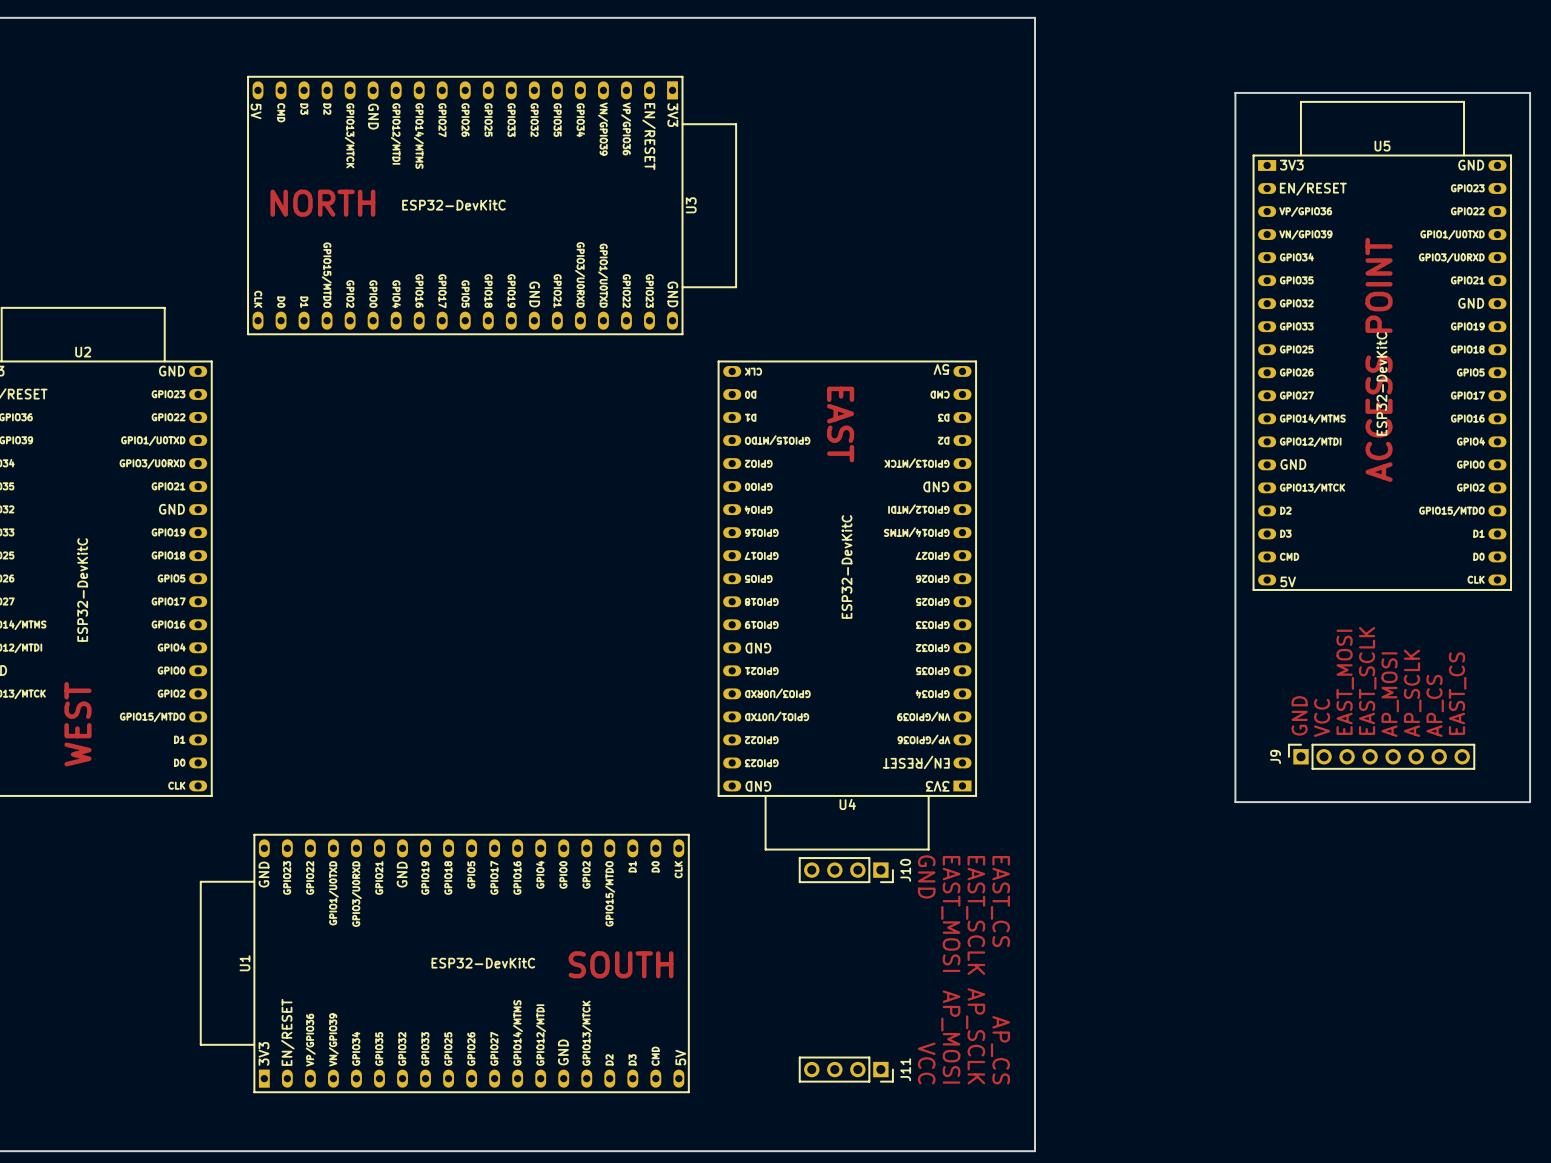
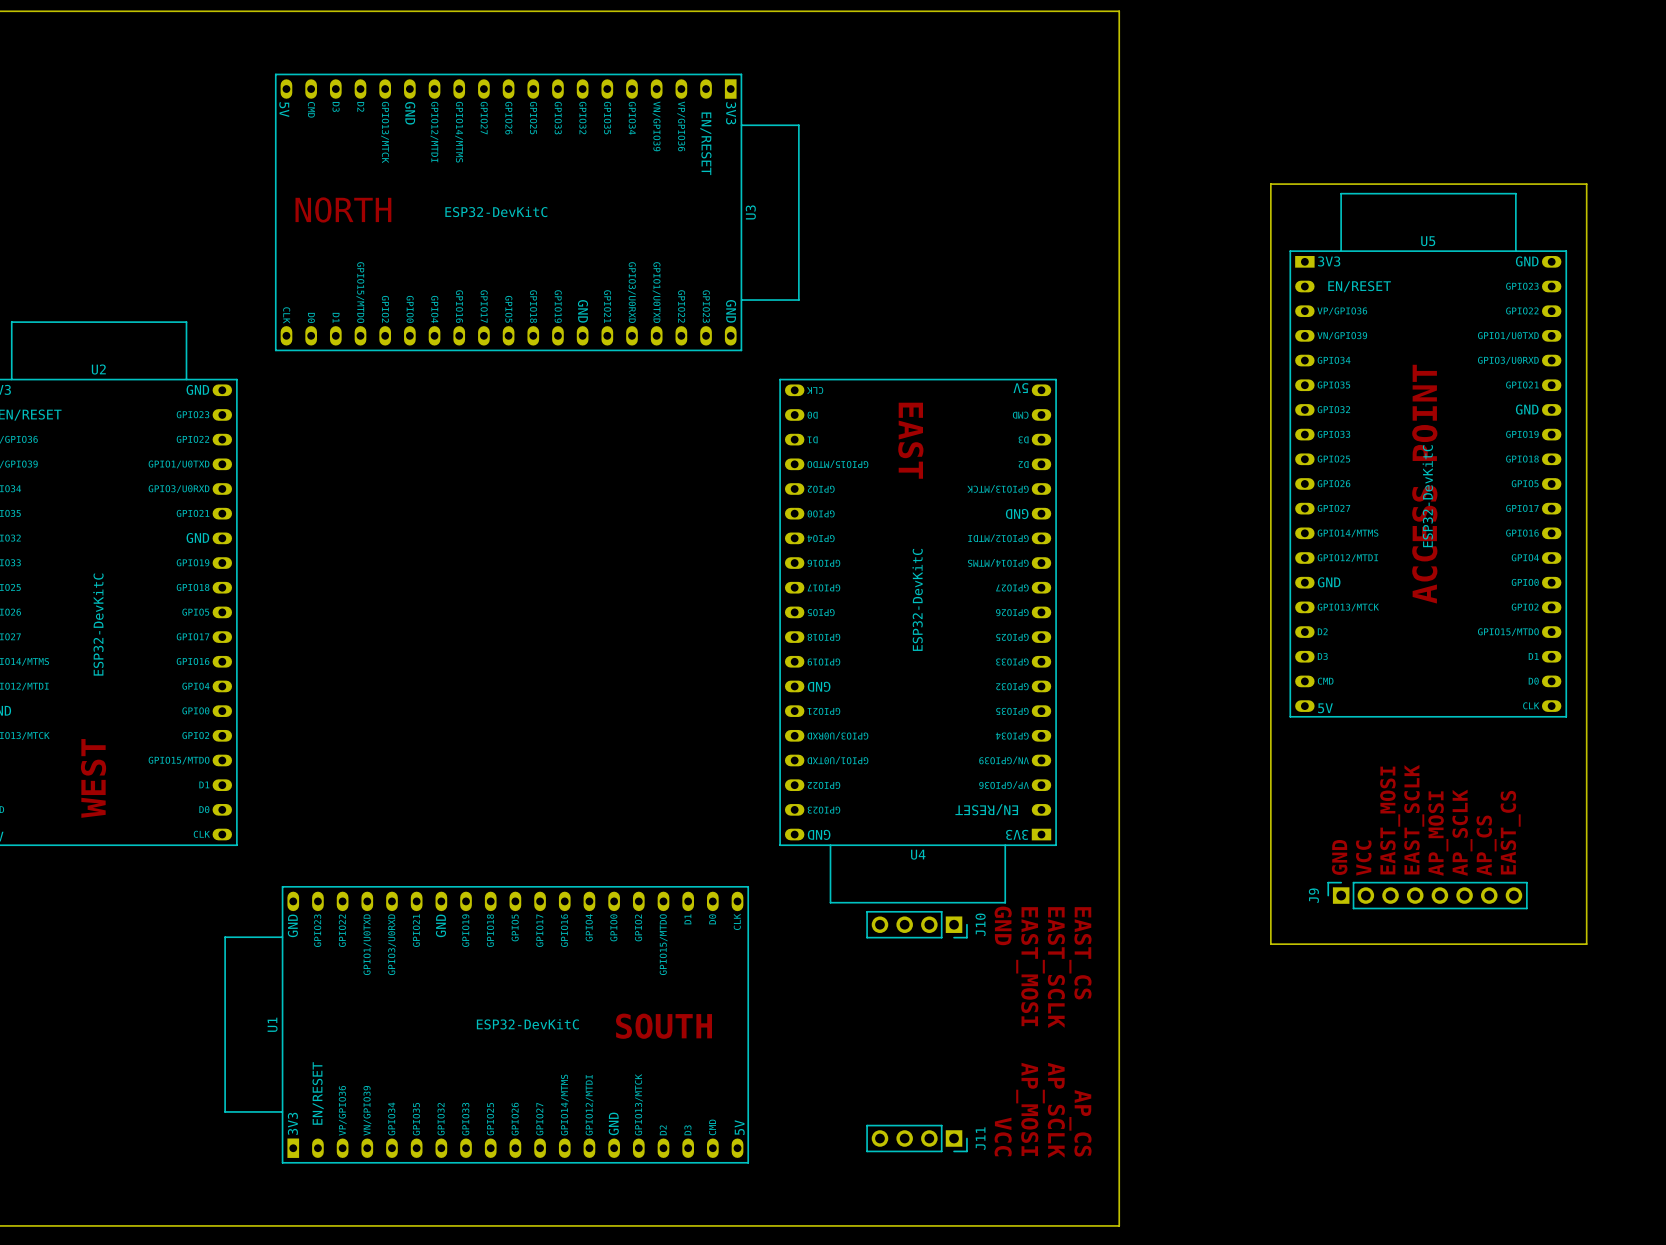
board edge: (1235, 92) (1530, 92) (1530, 802) (1235, 802) (1235, 92) -> (1270, 184) (1270, 944) (1586, 944) (1586, 184) (1270, 184)
U5 position: (1382, 345) -> (1428, 455)
text position: ACCESS POINT (1379, 359) -> ACCESS POINT (1424, 484)
text position: EAST_SCLK (1367, 680) -> EAST_SCLK (1414, 819)
text position: EAST_MOSI (1345, 682) -> EAST_MOSI (1390, 820)
text position: AP_SCLK (1412, 693) -> AP_SCLK (1462, 832)
text position: EAST_CS (1457, 693) -> EAST_CS (1510, 832)
text position: AP_MOSI (1390, 694) -> AP_MOSI (1438, 833)
text position: AP_CS (1435, 705) -> AP_CS (1486, 845)
text position: GND (1299, 715) -> GND (1339, 857)
text position: VCC (1322, 717) -> VCC (1363, 858)
J9 position: (1381, 756) -> (1427, 895)

